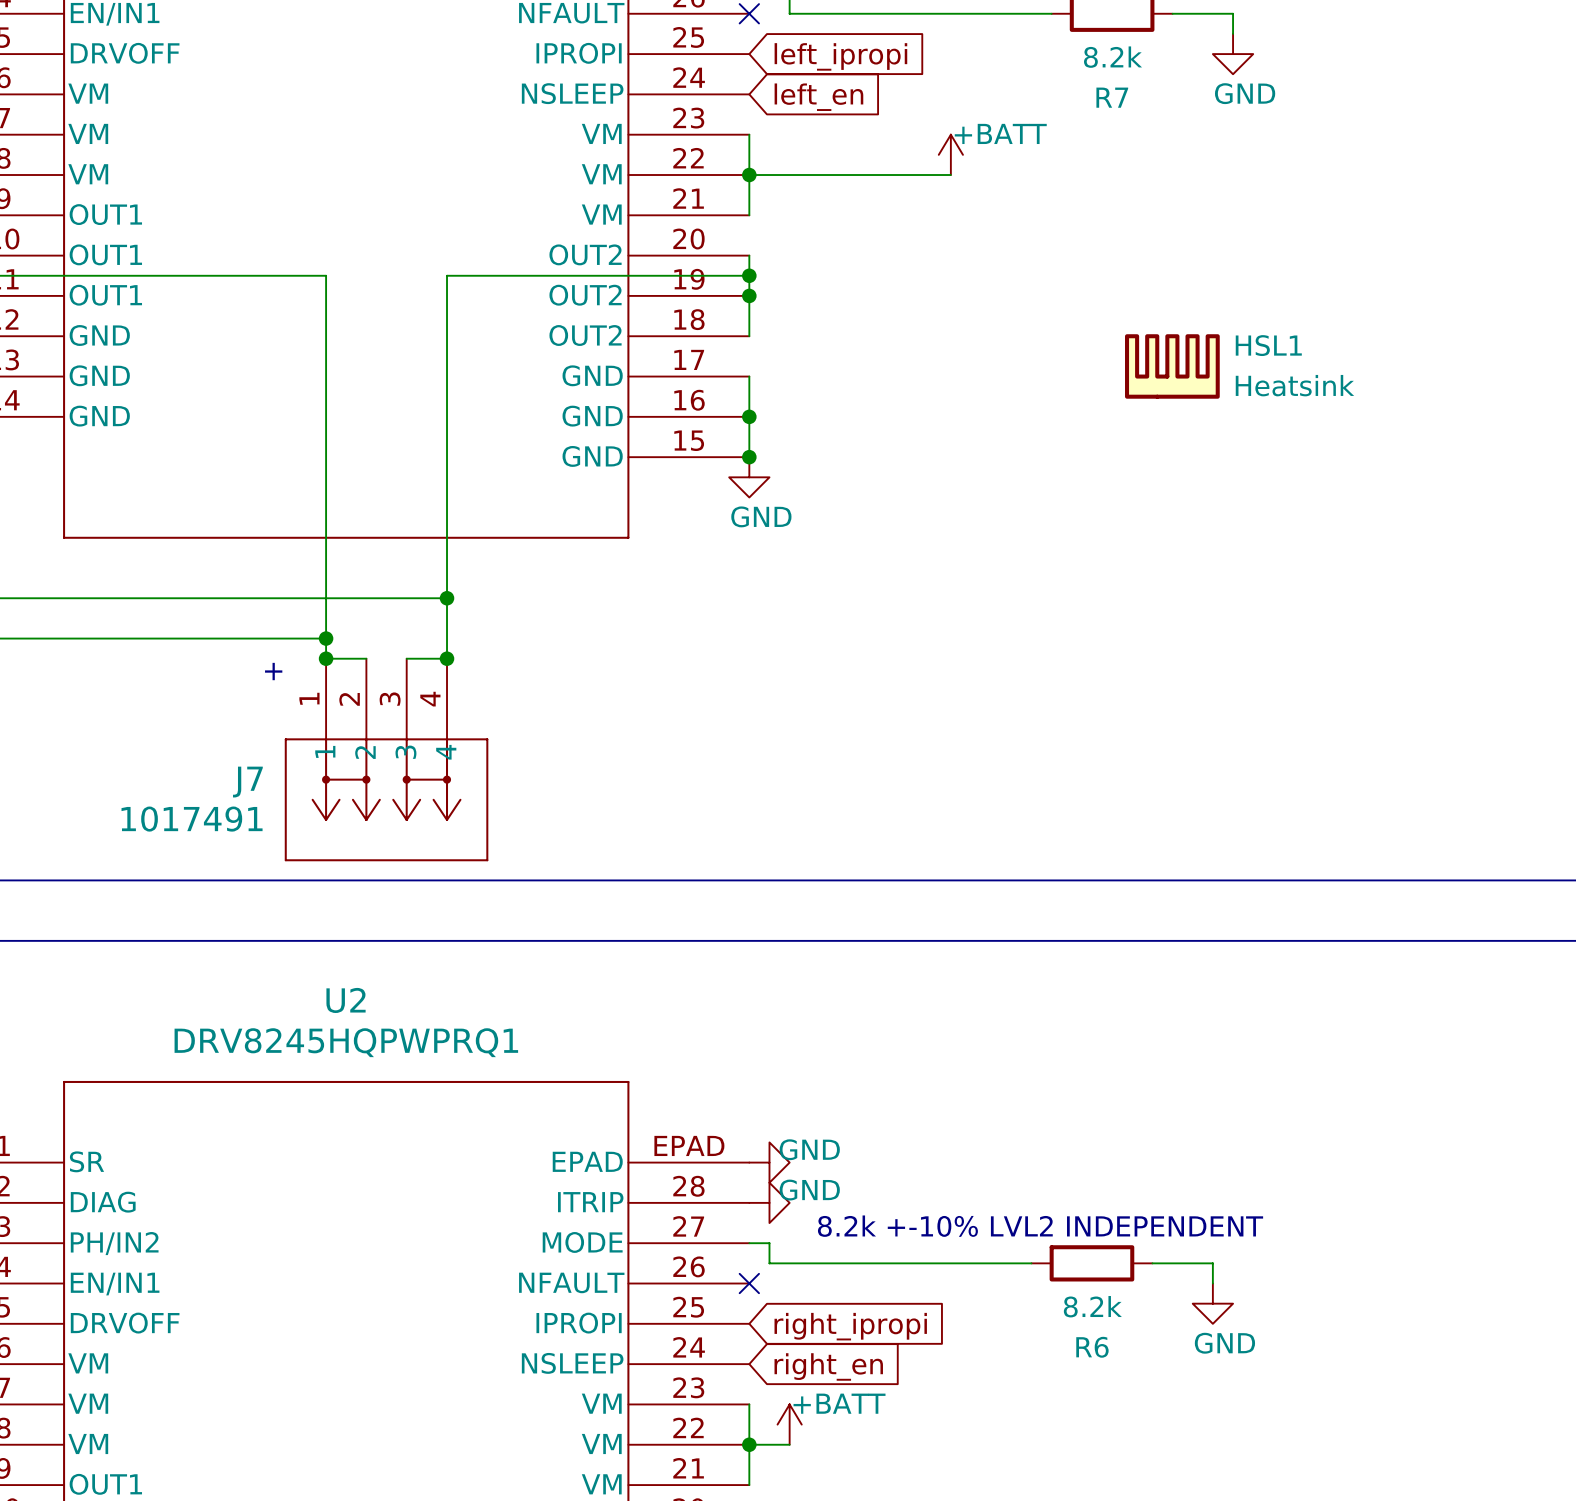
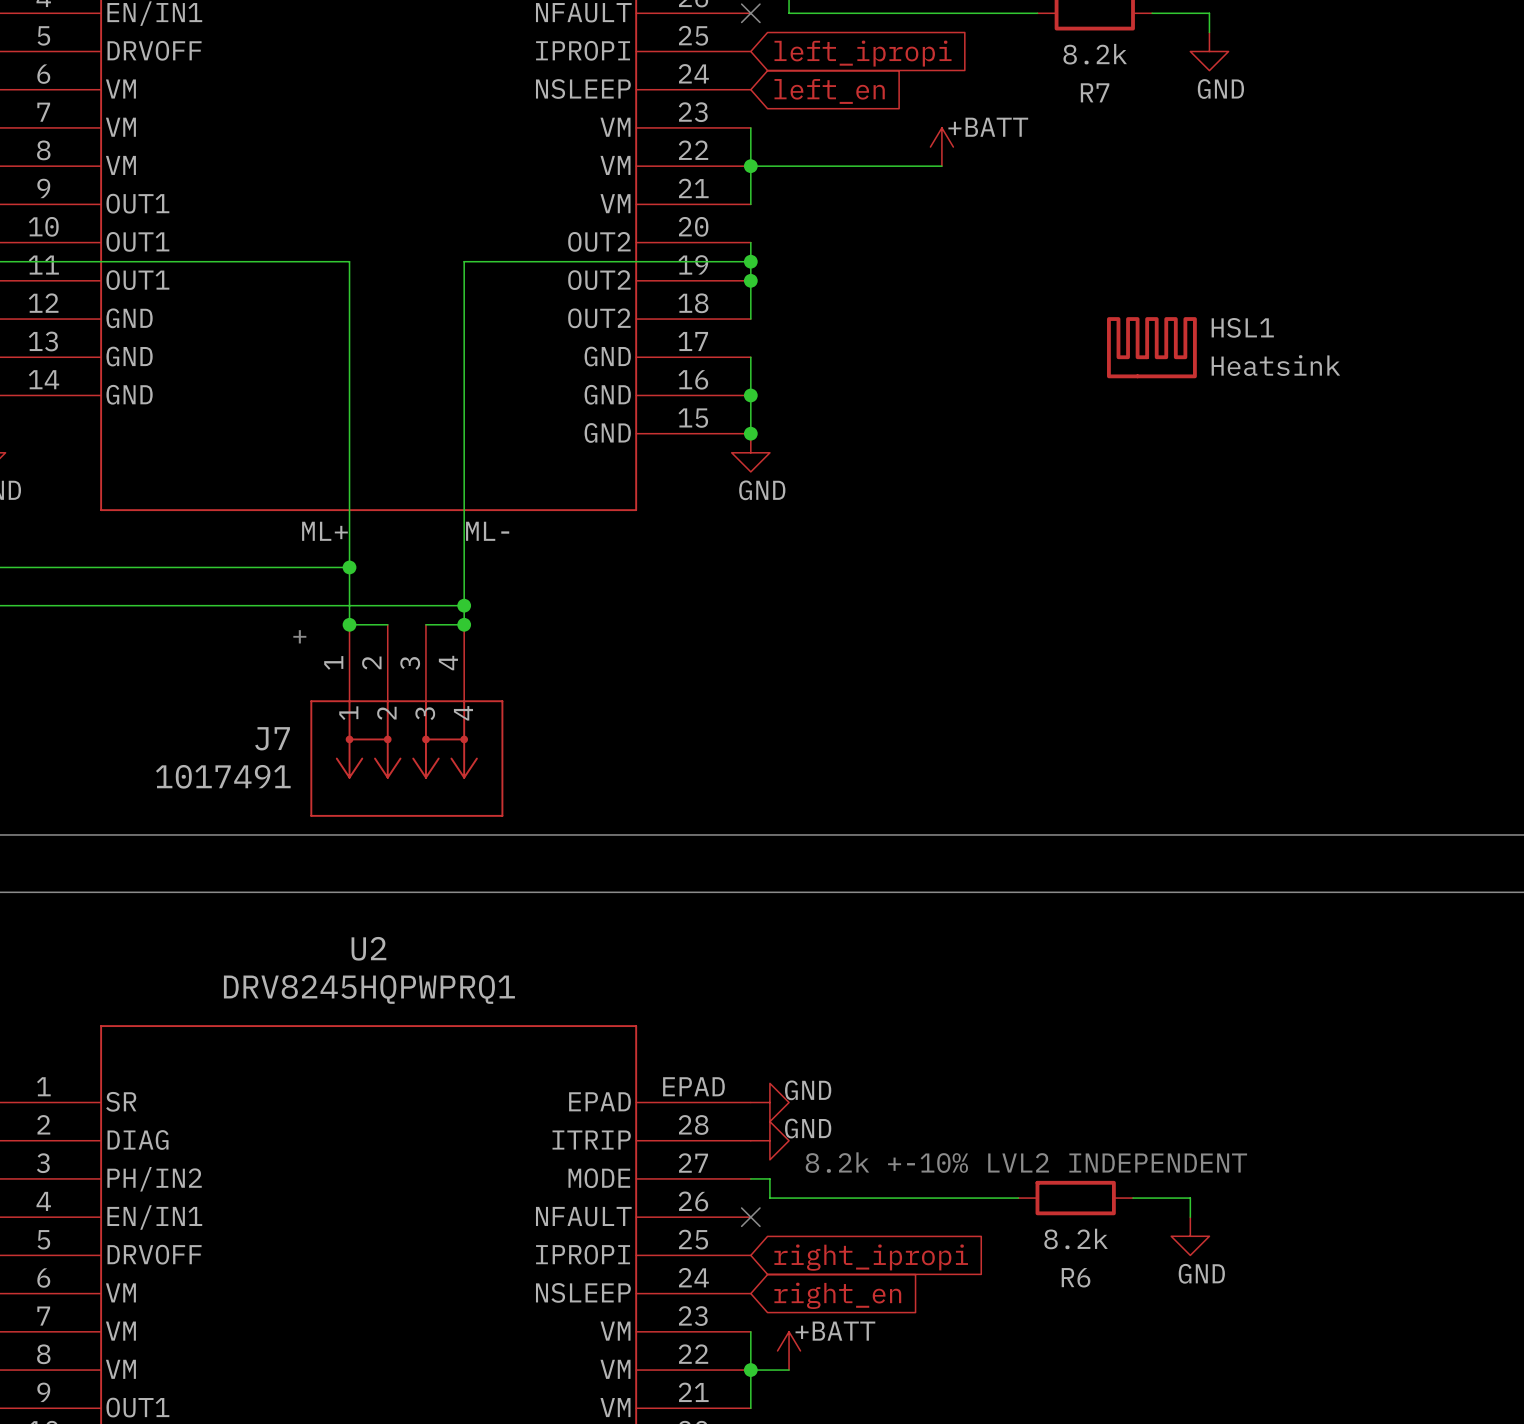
label: none -> ML+ (324, 531)
label: none -> ML- (487, 531)
wire: (326, 598) (447, 598) -> (349, 605) (464, 605)
junction position: (447, 598) -> (464, 605)
junction position: (326, 638) -> (349, 567)

